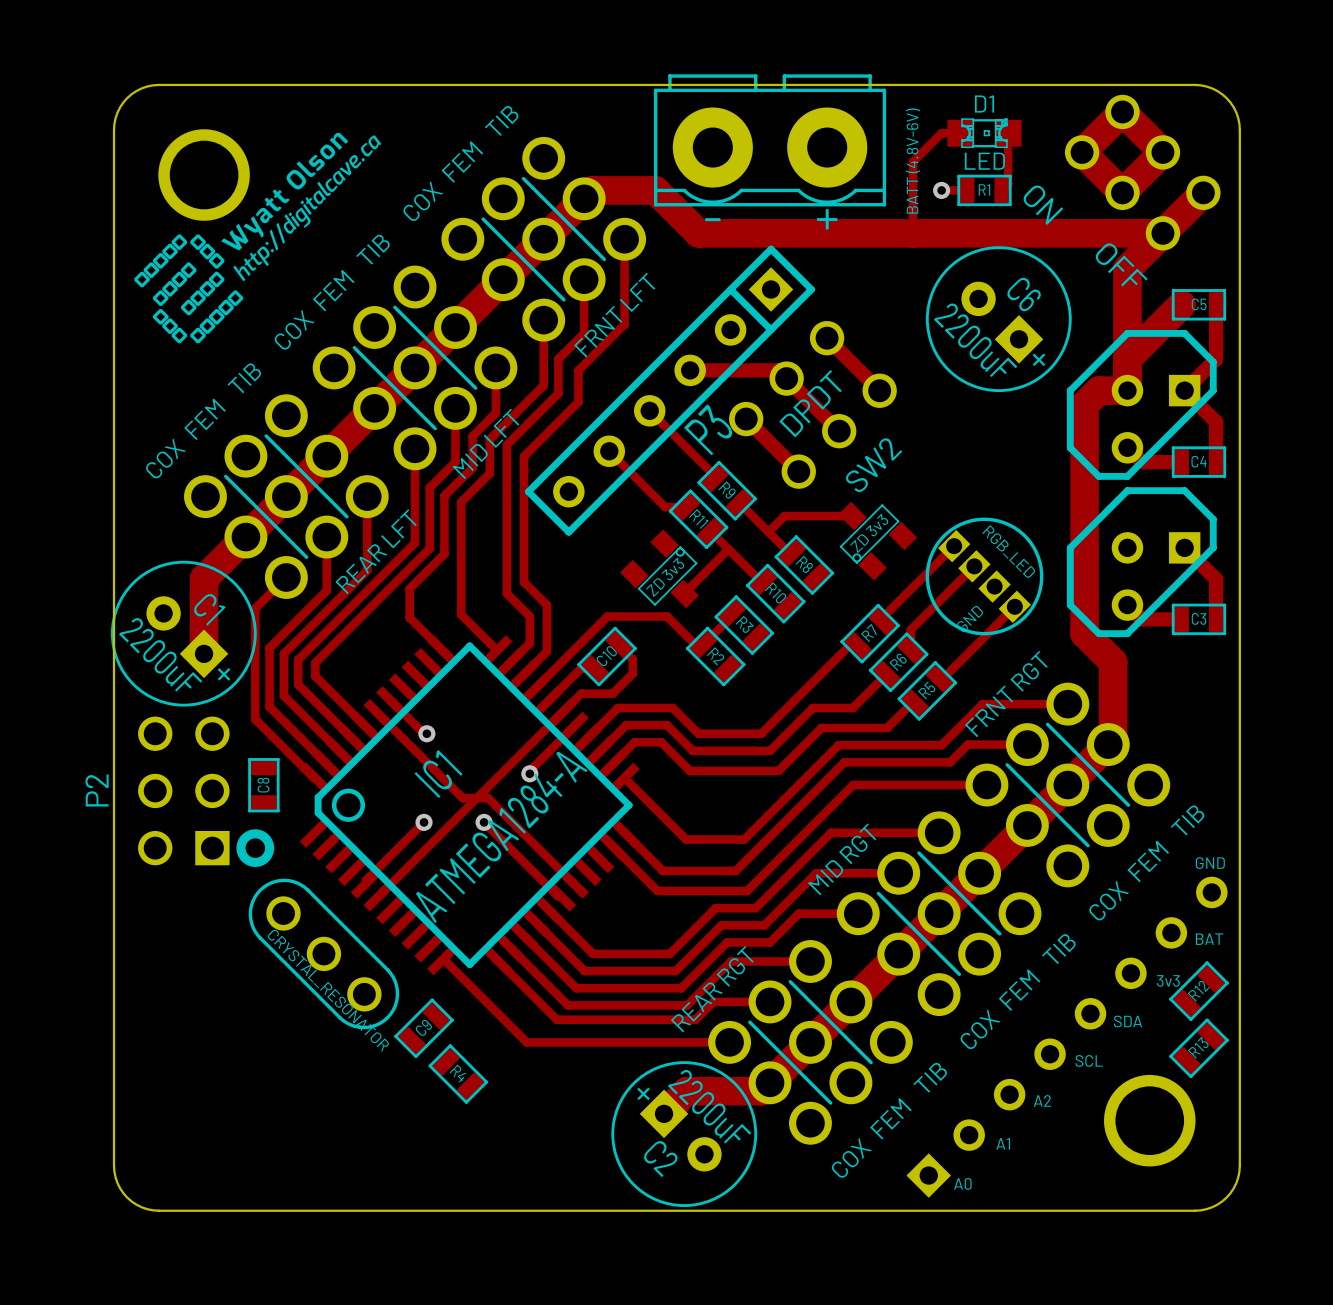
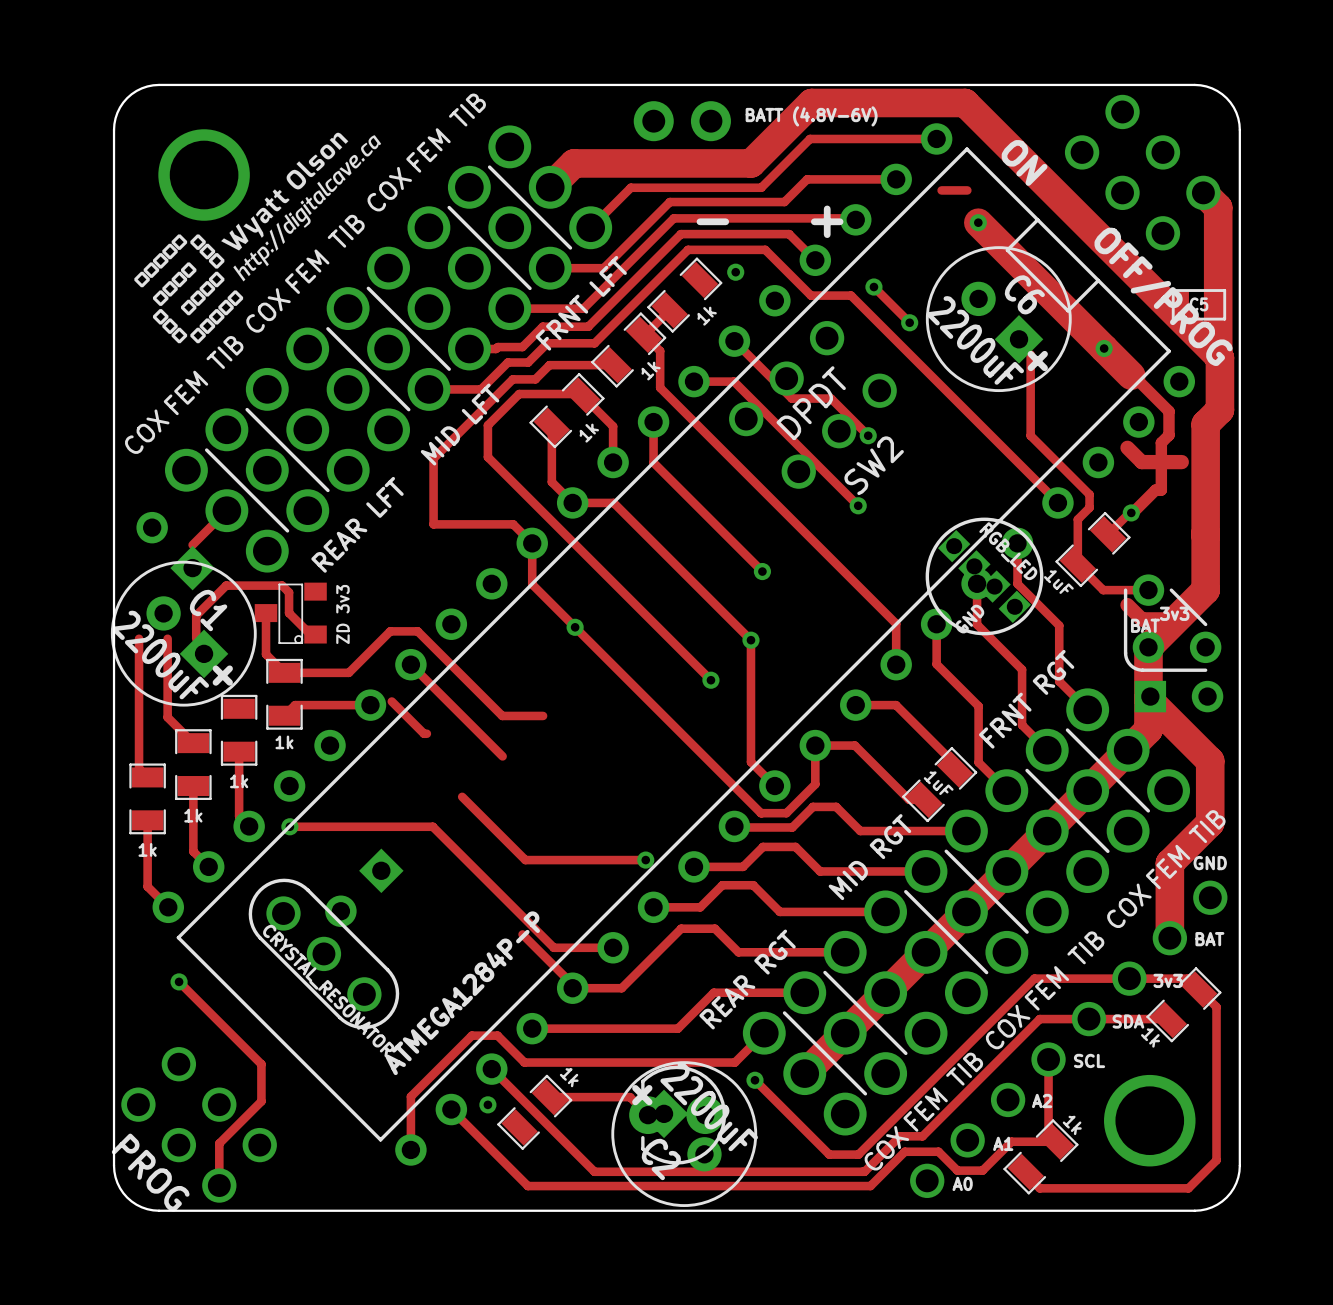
track: (1122, 111) (1082, 152) (1122, 192) (1162, 152) (1122, 111) -> none
part: none -> BATT (4.8V-6V) (682, 121)
track: (960, 133) (941, 133) (913, 161) (913, 233) -> none
D1: LED (984, 133) -> none
track: (1008, 133) (1008, 183) (1001, 190) -> none
track: none -> (936, 138) (810, 138) (761, 187) (630, 187) (590, 227)
part: BATT (4.8V-6V) (770, 140) -> none
track: none -> (896, 179) (807, 179) (784, 202) (669, 202) (603, 268) (550, 268)
track: none -> (550, 187) (573, 163) (751, 163) (811, 102) (965, 102) (1219, 357) (1219, 409) (1205, 424) (1205, 590) (1148, 647) (1148, 729) (804, 1073)
via position: (941, 190) -> (978, 222)
R1: (984, 190) -> none
track: (1203, 192) (1127, 268) (1127, 390) (1098, 390) (1084, 404) (1084, 633) (1113, 662) (1113, 739) (761, 1091) (686, 1091) (664, 1113) -> (1203, 192) (1218, 207) (1218, 356)
text position: ON (1043, 205) -> ON (1024, 162)
track: none -> (855, 219) (673, 218) (583, 308) (509, 308)
track: none -> (978, 222) (1131, 375)
track: (1162, 233) (698, 233) (655, 190) (592, 190) (204, 578) (204, 653) -> none
part position: (543, 239) -> (509, 227)
track: (624, 239) (624, 324) (578, 370) (578, 402) (524, 456) (524, 582) (546, 605) (546, 651) (522, 676) -> none
track: none -> (815, 260) (789, 234) (680, 234) (588, 326) (542, 326) (522, 347) (469, 348)
text: OFF (1121, 264) -> OFF/PROG (1163, 296)
via: none -> (735, 272)
track: (584, 279) (584, 333) (558, 359) (558, 393) (506, 444) (506, 593) (529, 616) (529, 643) (509, 663) -> none
track: none -> (873, 287) (909, 322)
via: none -> (873, 287)
part: none -> 1k (684, 295)
track: (1181, 304) (1127, 359) -> none
track: (1216, 304) (1216, 359) (1184, 390) (1216, 422) (1216, 462) -> none
track: none -> (669, 310) (643, 334) (660, 351) (660, 387) (896, 623) (896, 664)
track: (543, 320) (543, 385) (489, 439) (489, 473) (461, 502) (461, 614) (497, 650) -> none
via: none -> (909, 322)
track: (827, 338) (879, 390) -> none
track: none -> (734, 341) (791, 398) (831, 398) (868, 435)
via: none -> (1104, 348)
part: none -> 1k (628, 349)
track: none -> (1030, 354) (1030, 435) (1089, 494) (1089, 507) (1077, 519) (1077, 564) (1103, 590) (1148, 590)
track: none -> (613, 365) (549, 365) (535, 379)
part position: (415, 367) -> (388, 348)
track: (495, 367) (495, 413) (472, 436) (472, 467) (444, 496) (444, 554) (409, 588) (409, 617) (442, 650) -> none
track: (690, 370) (778, 370) (839, 431) -> none
track: none -> (1133, 375) (1168, 411) (1168, 435) (1161, 442) (1161, 490) (1155, 490) (1108, 534)
track: none -> (535, 379) (512, 379) (433, 458) (433, 524) (513, 524) (532, 543) (532, 584) (760, 813) (786, 813) (815, 784) (815, 745) (854, 745) (909, 799) (924, 799)
track: none -> (694, 381) (734, 381) (858, 505)
track: none -> (429, 389) (481, 389) (507, 362) (528, 362) (547, 343) (594, 343) (688, 249) (765, 249) (811, 295) (851, 295) (1057, 502)
P3: (669, 390) -> none
track: none -> (582, 395) (613, 426) (613, 462)
track: none -> (586, 402) (577, 394) (519, 394) (487, 425) (487, 457) (710, 680)
part: (1141, 404) -> none
track: (455, 408) (455, 462) (429, 487) (429, 548) (315, 662) (315, 676) (366, 726) -> none
part: none -> 1k (567, 410)
track: (649, 410) (715, 476) (715, 478) -> none
track: (746, 419) (798, 471) -> none
track: none -> (653, 422) (653, 462) (762, 571)
track: none -> (551, 425) (551, 482) (572, 502) (613, 502) (750, 640) (750, 762) (774, 786)
via: none -> (868, 435)
track: (415, 448) (415, 542) (298, 659) (298, 684) (353, 739) -> none
track: (609, 451) (665, 507) (686, 507) -> none
C4: (1198, 462) -> none
R9: (727, 490) -> none
part position: (286, 496) -> (267, 470)
track: (367, 496) (367, 570) (283, 653) (283, 695) (340, 752) -> none
track: (739, 502) (789, 552) (792, 552) -> none
via: none -> (858, 505)
track: none -> (226, 510) (192, 544)
via: none -> (1131, 512)
track: (852, 516) (784, 516) (768, 532) -> none
R11: (698, 519) -> none
track: (710, 531) (760, 581) (763, 581) -> none
track: (326, 537) (326, 590) (269, 647) (269, 706) (327, 765) -> none
part: ZD 3v3 (877, 541) -> none
track: none -> (1017, 543) (1017, 583) (1059, 625) (1059, 681) (1087, 709)
track: (954, 546) (882, 618) (882, 621) -> none
track: (1184, 547) (1216, 579) (1216, 619) -> none
track: (728, 549) (684, 593) -> none
part: none -> 1uF (1092, 549)
part: none -> (175, 551)
part: (1141, 562) -> none
R8: (804, 565) -> none
track: (974, 566) (910, 629) (910, 650) -> none
part: ZD 3v3 (659, 568) -> none
via: none -> (762, 571)
track: (286, 577) (255, 608) (255, 719) (315, 777) -> none
track: none -> (977, 583) (977, 624) (1022, 669) (1022, 725) (1047, 750)
R10: (775, 593) -> none
track: (1014, 606) (942, 678) (939, 678) -> none
track: (732, 612) (732, 615) (703, 644) (694, 644) (667, 616) (607, 616) (535, 688) -> none
track: none -> (266, 613) (266, 654) (284, 672) (348, 672) (390, 631) (417, 631) (502, 715) (543, 715)
part: none -> ZD 3v3 (290, 613)
text: none -> 3v3 (1174, 613)
C3: (1198, 619) -> none
part: none -> (1172, 623)
track: none -> (936, 624) (936, 664) (978, 706) (978, 762) (1006, 790)
R3: (744, 625) -> none
text: none -> BAT (1145, 625)
via: none -> (575, 627)
R7: (870, 633) -> none
track: none -> (315, 634) (310, 634) (289, 613) (289, 592) (282, 585) (226, 585) (196, 615) (196, 638)
track: none -> (139, 638) (139, 768) (147, 777)
track: none -> (167, 638) (167, 717) (193, 743)
via: none -> (750, 640)
track: (619, 644) (632, 659) (632, 673) (612, 693) (581, 693) (378, 896) -> none
part: none -> ATMEGA1284P-P (673, 644)
track: (857, 645) (849, 645) (761, 733) (698, 733) (672, 708) (617, 708) (586, 739) -> none
C10: (607, 656) -> none
R2: (715, 656) -> none
R6: (898, 662) -> none
track: none -> (410, 664) (502, 756)
track: (594, 668) (580, 668) (548, 701) -> none
track: (886, 674) (852, 708) (812, 708) (770, 750) (692, 750) (667, 725) (626, 725) (598, 752) -> none
via: none -> (710, 680)
R5: (927, 690) -> none
part: none -> 1k (284, 694)
part: none -> (1178, 696)
track: none -> (1148, 699) (1210, 761) (1210, 822) (1169, 863) (1169, 938)
track: (915, 702) (912, 702) (887, 728) (821, 728) (778, 770) (689, 770) (661, 742) (634, 742) (611, 765) -> none
track: (1067, 704) (982, 704) (941, 745) (838, 745) (744, 839) (686, 839) (624, 777) -> none
track: none -> (370, 705) (295, 705) (284, 715)
track: none -> (855, 705) (896, 705) (954, 764) (954, 769)
track: (378, 714) (462, 798) (488, 798) (573, 883) -> none
track: (573, 727) (529, 770) (529, 773) -> none
part: none -> 1k (239, 730)
via: (426, 733) -> none
track: (1027, 744) (967, 744) (950, 762) (844, 762) (735, 871) (662, 871) (624, 832) -> none
track: none -> (239, 751) (239, 816) (249, 826)
part: none -> 1k (193, 764)
via: (529, 773) -> none
part: none -> 1uF (939, 784)
C8: (263, 785) -> none
track: (986, 785) (853, 785) (747, 891) (657, 891) (611, 845) -> none
part position: (1067, 785) -> (1087, 790)
track: none -> (193, 786) (193, 851) (208, 866)
P2: (206, 791) -> none
track: none -> (462, 796) (525, 860) (645, 860)
part: none -> 1k (147, 798)
IC1: ATMEGA1284-A (469, 805) -> none
track: none -> (147, 820) (147, 886) (168, 907)
track: (424, 822) (366, 880) (366, 883) -> none
via: (424, 822) -> none
track: (484, 822) (557, 896) (560, 896) -> none
via: (484, 822) -> none
track: none -> (289, 826) (432, 826) (553, 947) (613, 947)
via: none -> (289, 826)
track: none -> (734, 826) (792, 827) (812, 806) (836, 806) (860, 831) (966, 831)
track: (939, 832) (831, 832) (755, 908) (715, 908) (669, 953) (593, 953) (548, 908) -> none
via: none -> (645, 860)
track: none -> (694, 866) (743, 866) (762, 846) (795, 846) (820, 871) (925, 871)
track: (898, 873) (816, 873) (764, 925) (721, 925) (675, 971) (584, 971) (535, 921) -> none
part footprint: [906, 876, 1228, 1198] -> [910, 880, 1228, 1198]
part: none -> (364, 887)
track: none -> (653, 907) (700, 907) (722, 885) (753, 885) (779, 911) (885, 911)
track: (858, 913) (798, 913) (770, 942) (727, 942) (681, 988) (621, 988) -> (845, 952) (738, 952) (714, 928) (681, 928) (621, 988)
part position: (939, 913) -> (966, 911)
track: (509, 947) (568, 1005) (687, 1005) (731, 961) (810, 961) -> none
track: (442, 959) (526, 1042) (729, 1042) -> none
track: (497, 959) (556, 1019) (695, 1019) (713, 1001) (770, 1001) -> none
track: none -> (179, 981) (261, 1064) (261, 1101) (219, 1143) (219, 1185)
via: none -> (179, 981)
R12: (1198, 991) -> none
track: none -> (804, 992) (713, 992) (677, 1028) (532, 1028)
part: none -> 1k (1183, 1004)
track: none -> (1168, 1019) (1039, 1019) (922, 1136) (900, 1136) (864, 1171) (594, 1171) (491, 1069)
C9: (424, 1028) -> none
track: none -> (764, 1033) (734, 1062) (524, 1062) (497, 1035) (471, 1035) (410, 1096) (410, 1149)
part position: (810, 1042) -> (845, 1033)
R13: (1198, 1048) -> none
track: none -> (1048, 1059) (1048, 1134) (1056, 1141) (1011, 1141) (982, 1170) (957, 1170) (938, 1151) (904, 1151) (870, 1186) (527, 1186) (451, 1109)
R4: (458, 1074) -> none
track: none -> (754, 1080) (829, 1154) (858, 1154) (1034, 978) (1188, 978) (1216, 1007) (1216, 1160) (1188, 1188) (1039, 1188) (1025, 1172)
via: none -> (754, 1080)
track: none -> (549, 1097) (630, 1097) (648, 1115)
via: none -> (487, 1104)
part: none -> 1k (534, 1112)
part: none -> (677, 1115)
part: none -> PROG (199, 1124)
part: none -> 1k (1040, 1156)

